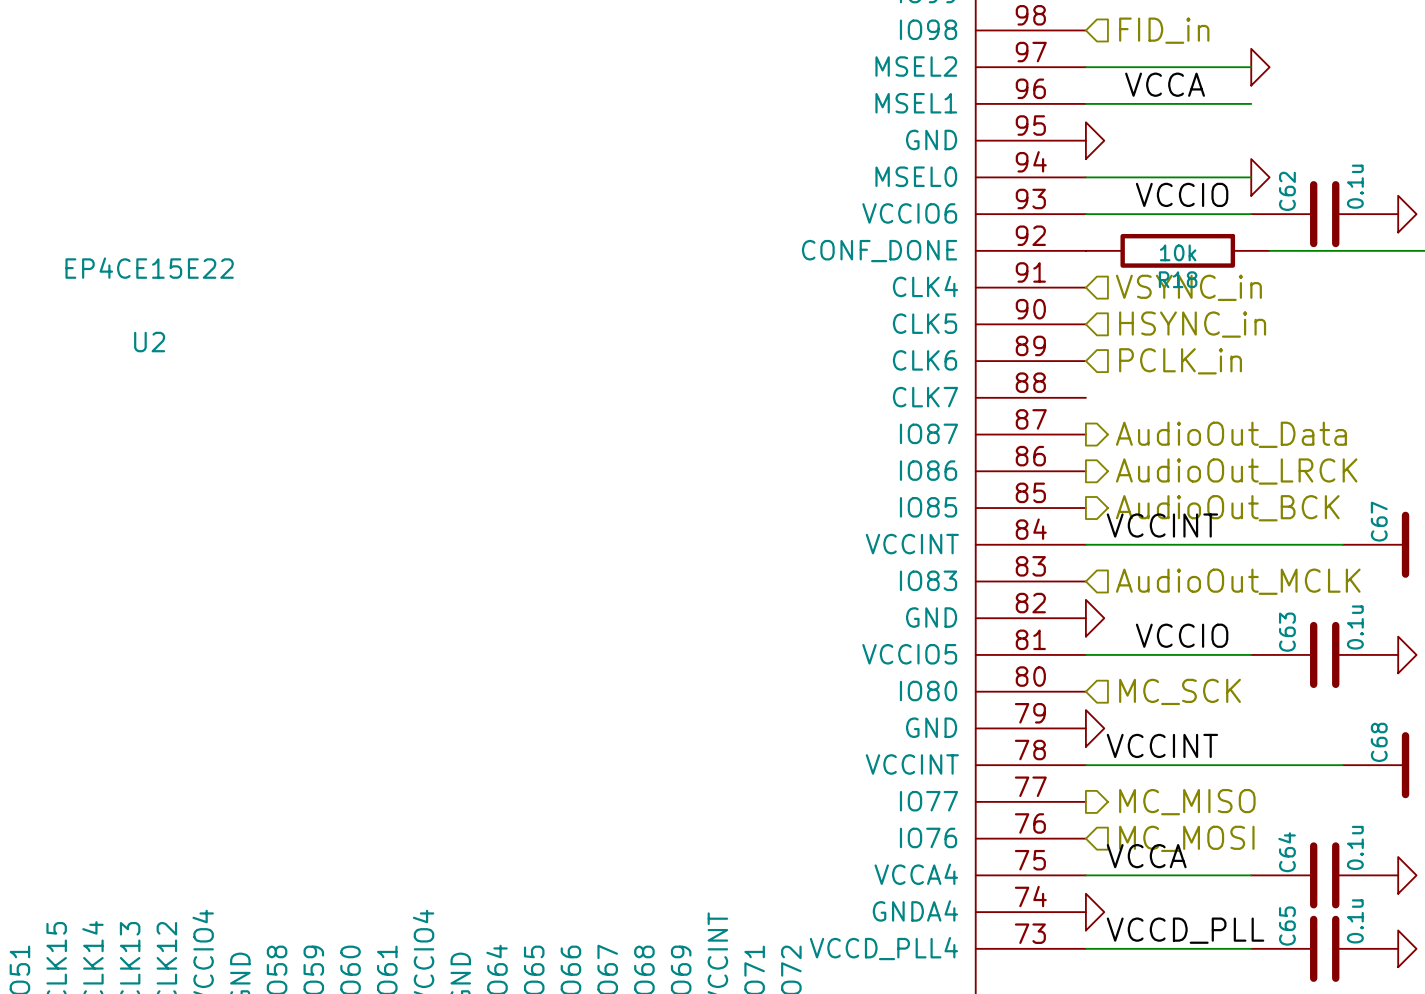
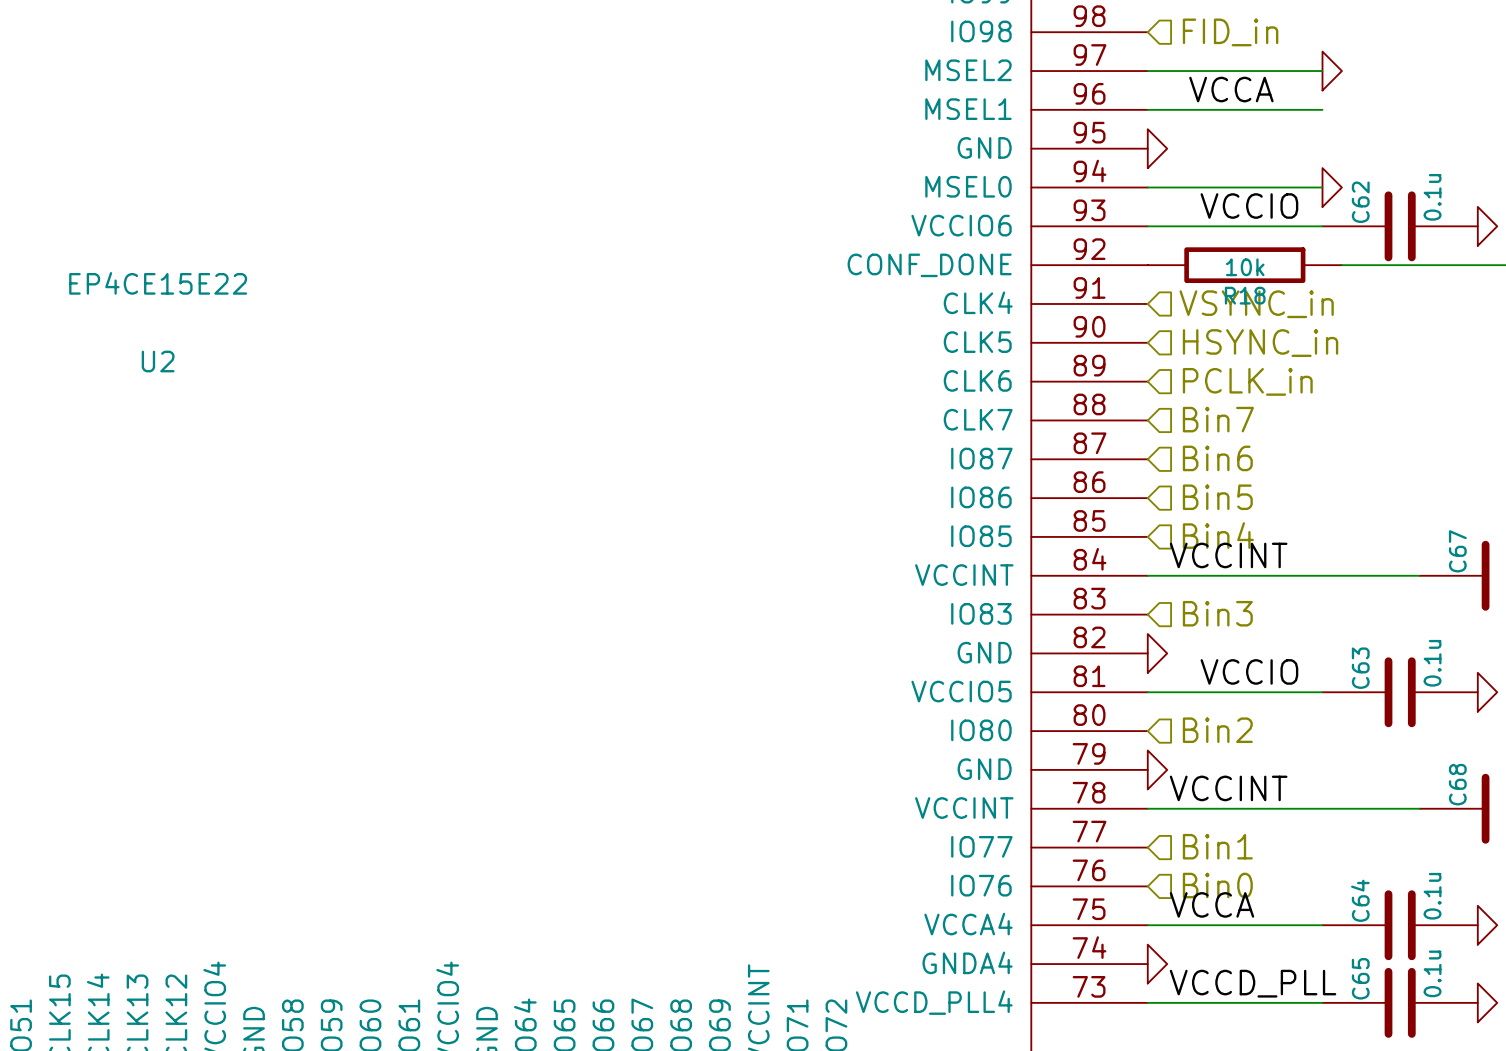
hierarchical label: none -> Bin7 (1218, 419)
hierarchical label shape: output (1231, 434) -> input (1217, 458)
hierarchical label: AudioOut_Data (1231, 434) -> Bin6 (1217, 458)
hierarchical label shape: output (1236, 471) -> input (1217, 497)
hierarchical label: AudioOut_LRCK (1236, 471) -> Bin5 (1217, 497)
hierarchical label shape: output (1227, 508) -> input (1218, 535)
hierarchical label: AudioOut_BCK (1227, 508) -> Bin4 (1218, 535)
hierarchical label: AudioOut_MCLK (1238, 581) -> Bin3 (1217, 613)
hierarchical label: MC_SCK (1180, 691) -> Bin2 (1217, 730)
hierarchical label shape: output (1187, 802) -> input (1217, 846)
hierarchical label: MC_MISO (1187, 802) -> Bin1 (1217, 846)
hierarchical label: MC_MOSI (1186, 838) -> Bin0 (1217, 885)

